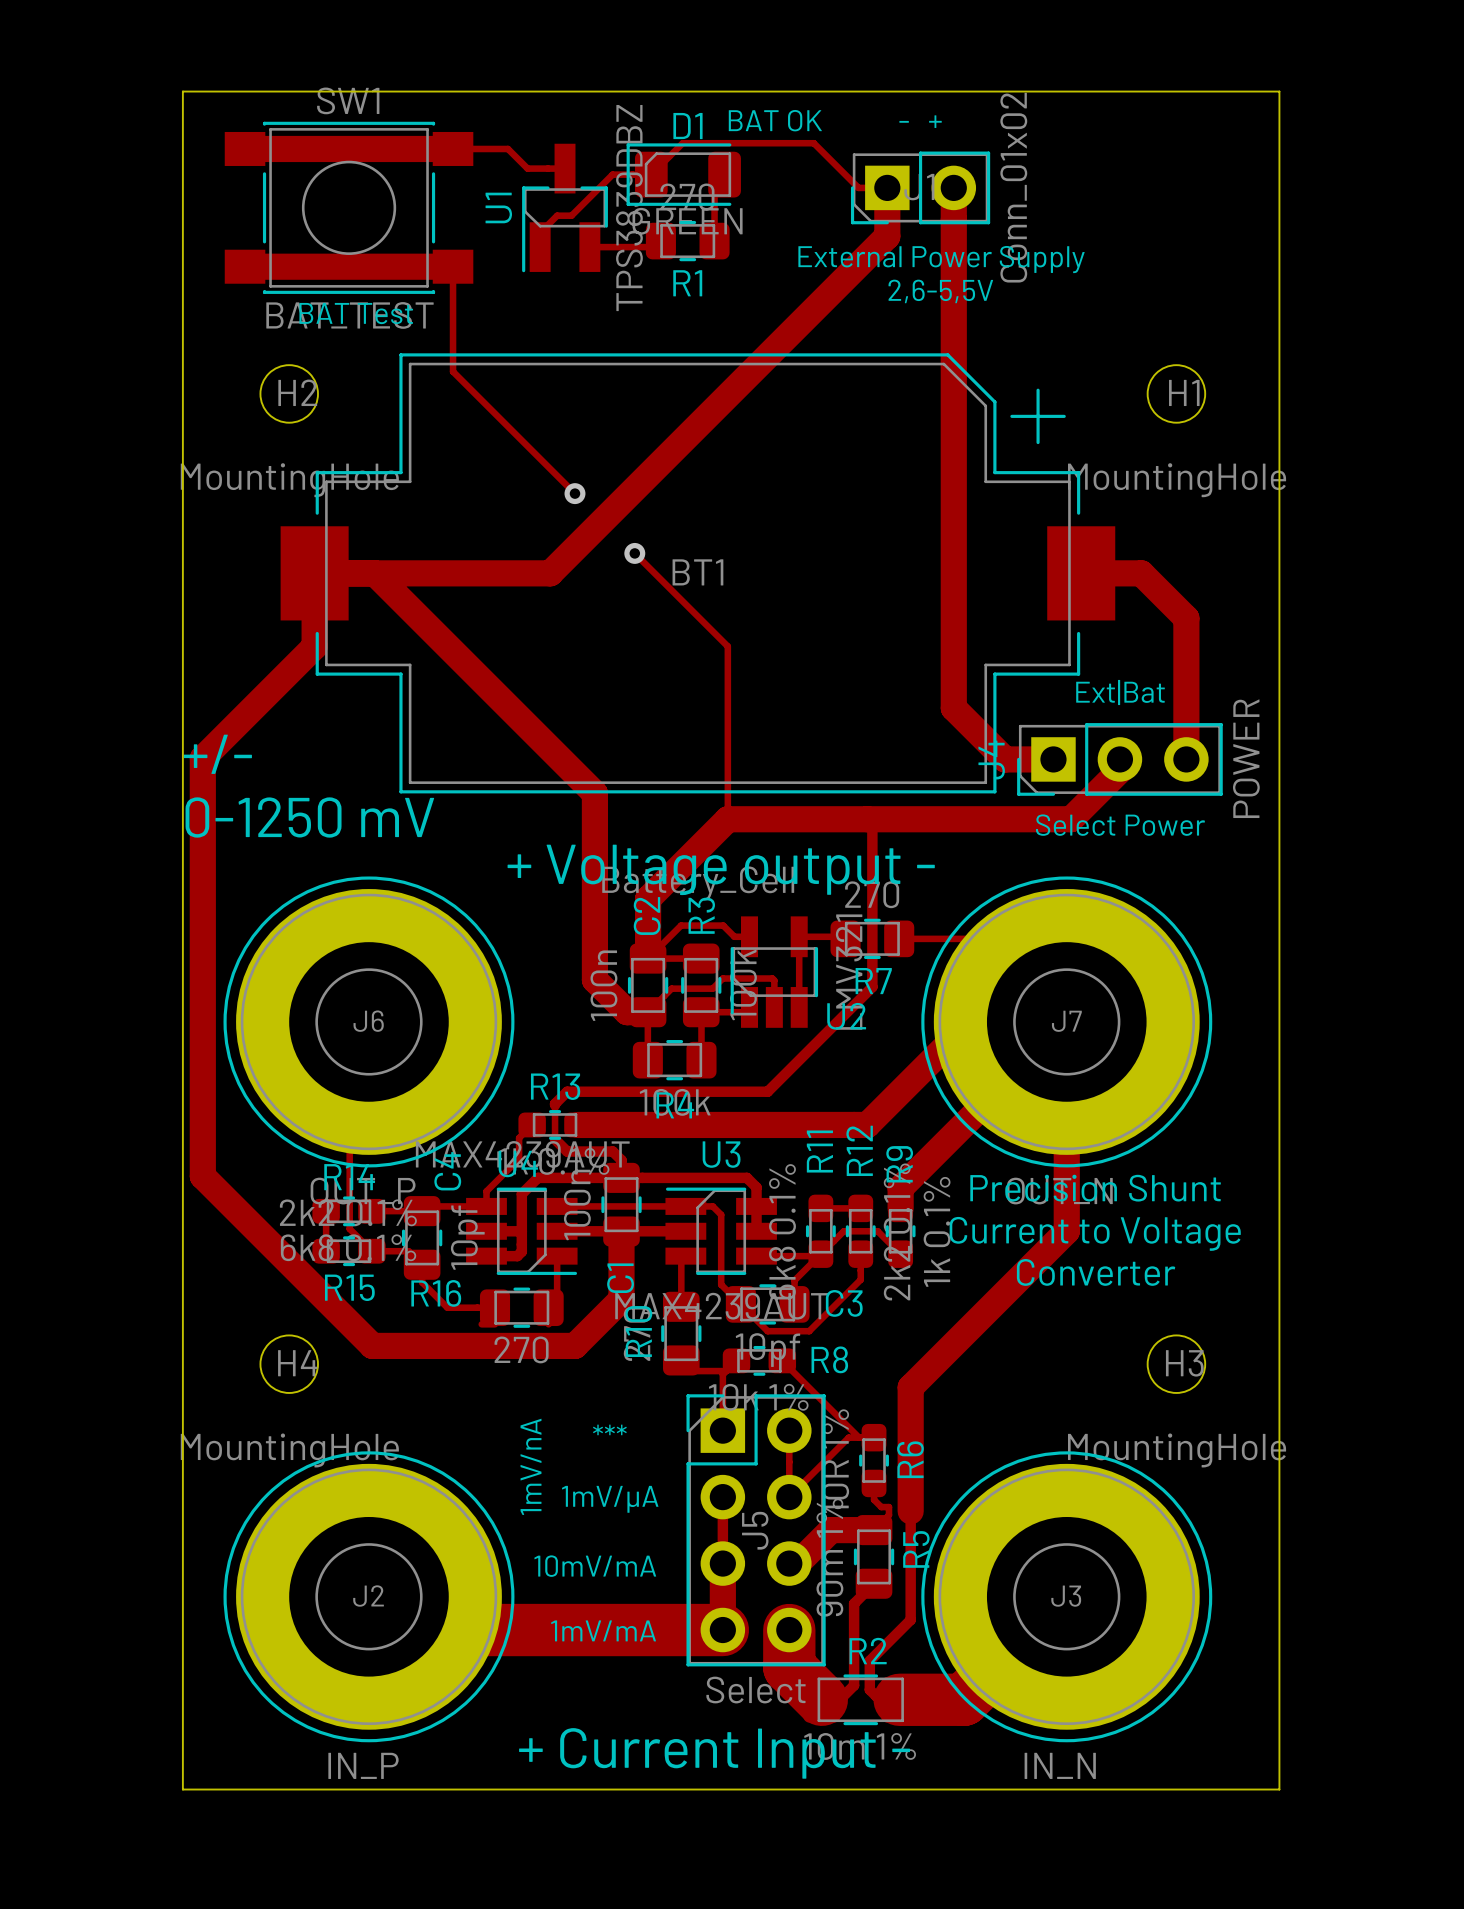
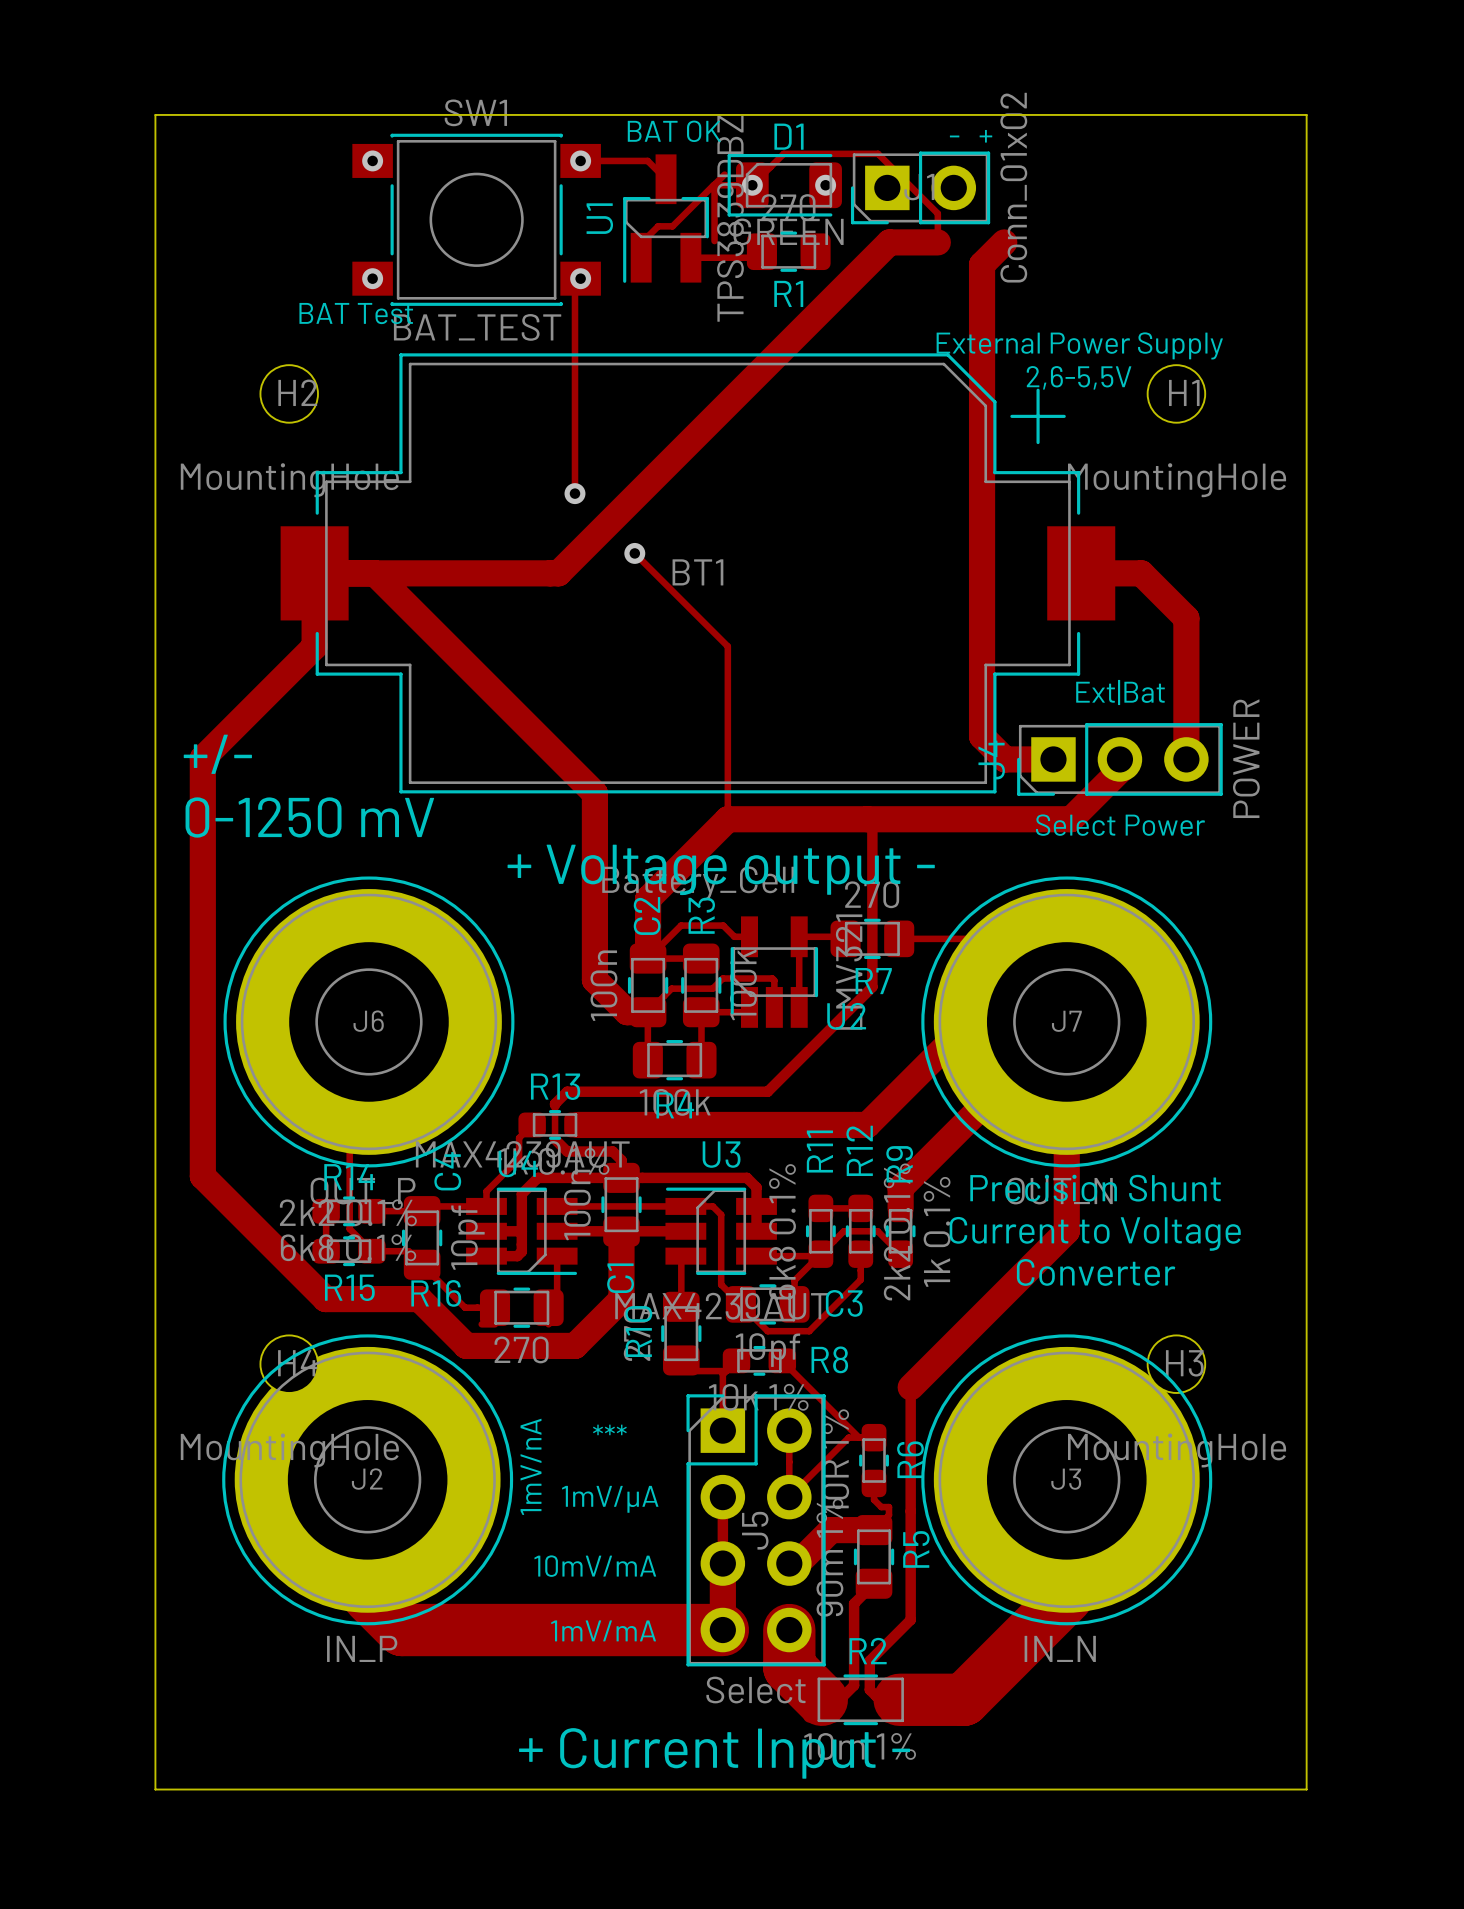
text position: BAT OK (775, 120) -> BAT OK (674, 131)
text position: - + (920, 121) -> - + (971, 136)
track: (245, 148) (507, 148) (527, 168) (565, 168) -> none
via: none -> (372, 160)
track: none -> (580, 160) (647, 160) (666, 179)
via: none -> (580, 160)
D1 position: (683, 174) -> (784, 185)
via: none -> (752, 185)
via: none -> (825, 185)
track: (953, 187) (953, 708) (982, 736) -> (1004, 242) (982, 264) (982, 736)
SW1 position: (349, 207) -> (476, 219)
U1 position: (565, 207) -> (666, 218)
track: (660, 241) (654, 247) (589, 247) -> (761, 251) (755, 257) (690, 257)
R1 position: (687, 241) -> (788, 251)
track: (540, 247) (540, 232) (557, 215) (571, 215) (612, 174) (651, 174) (682, 143) (813, 143) (858, 187) (887, 187) (887, 236) (550, 573) -> (641, 257) (641, 243) (658, 226) (672, 226) (713, 185) (752, 185) (783, 153) (878, 153) (937, 213) (937, 242) (889, 242) (558, 573) (550, 573)
text position: External Power Supply (941, 259) -> External Power Supply (1079, 345)
track: (245, 266) (453, 266) (453, 371) (574, 493) -> (580, 278) (574, 284) (574, 493)
via: none -> (372, 278)
via: none -> (580, 278)
text position: 2,6-5,5V (940, 291) -> 2,6-5,5V (1079, 377)
track: (422, 1264) (422, 1282) (447, 1307) (465, 1307) -> (422, 1264) (465, 1307)
track: (325, 1299) (372, 1345) (466, 1345) -> (325, 1299) (419, 1299) (466, 1345)
track width: thick (910, 1387) (910, 1511) -> thin (910, 1387) (910, 1511)
J2 position: (368, 1596) -> (367, 1479)
J3 position: (1066, 1596) -> (1066, 1479)
board edge: (182, 1789) (182, 91) (1279, 91) (1279, 1789) -> (182, 1789) (155, 1789) (155, 114) (1306, 114) (1306, 1789) (1279, 1789)

